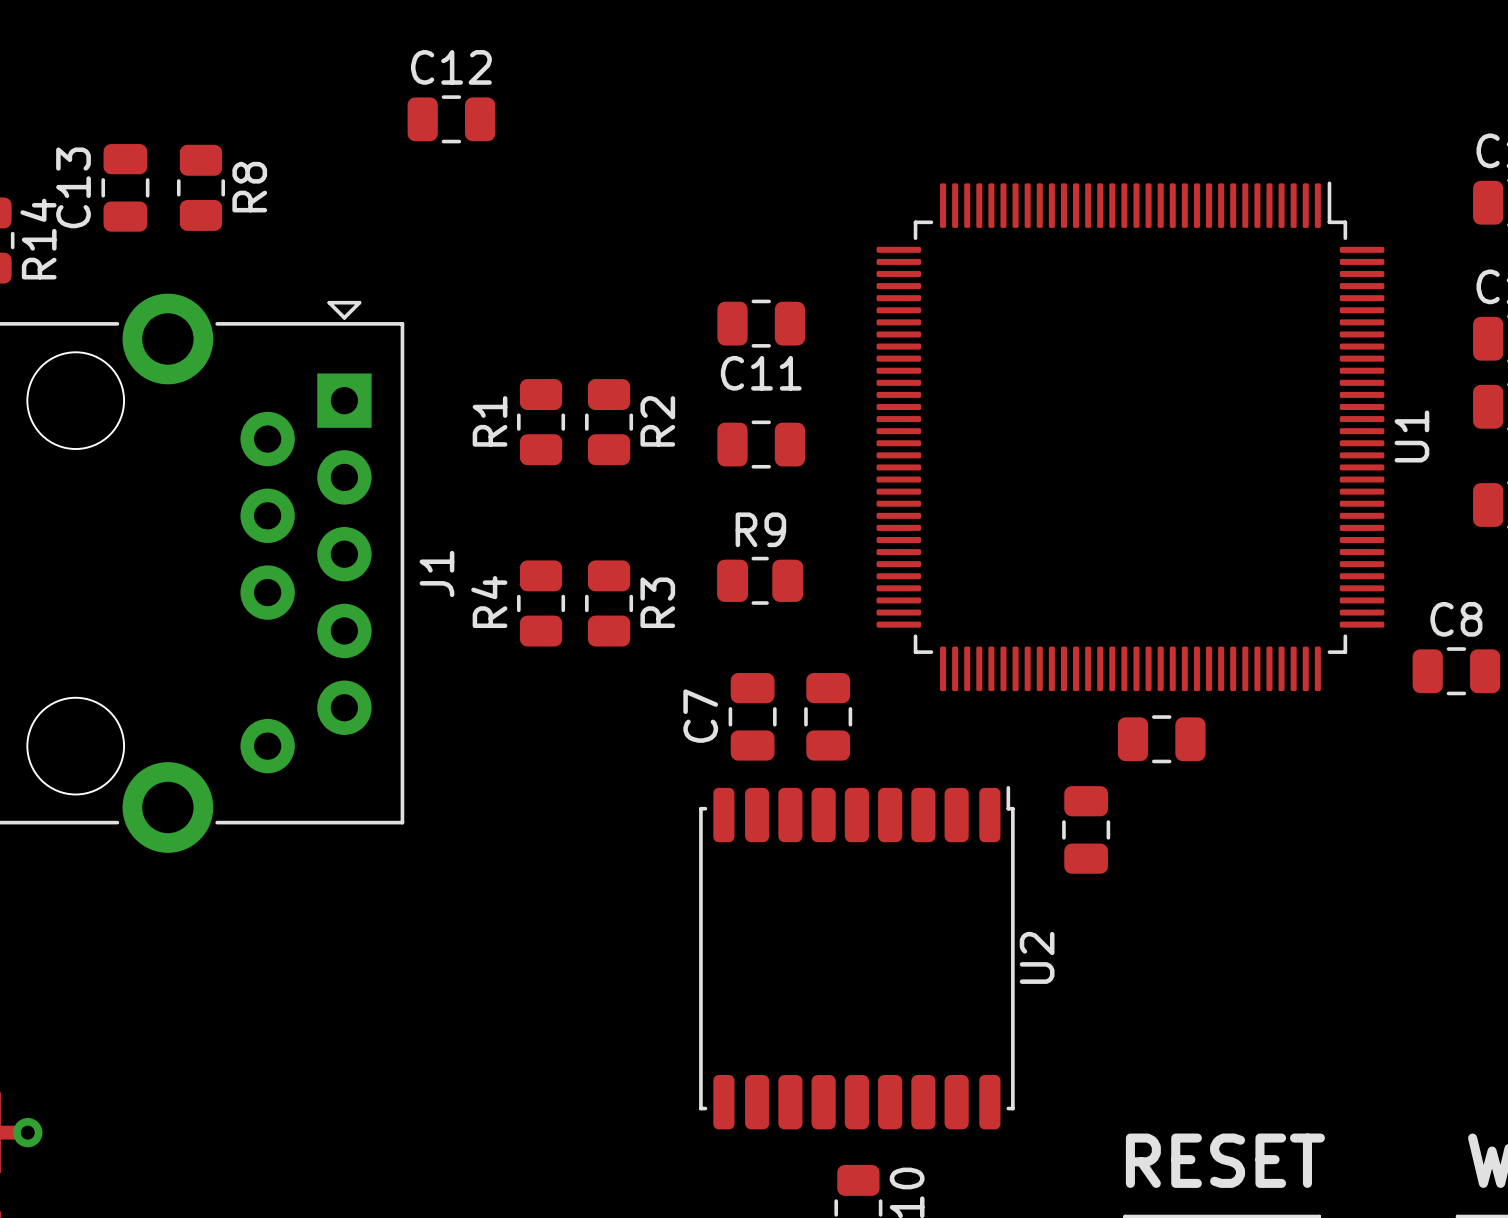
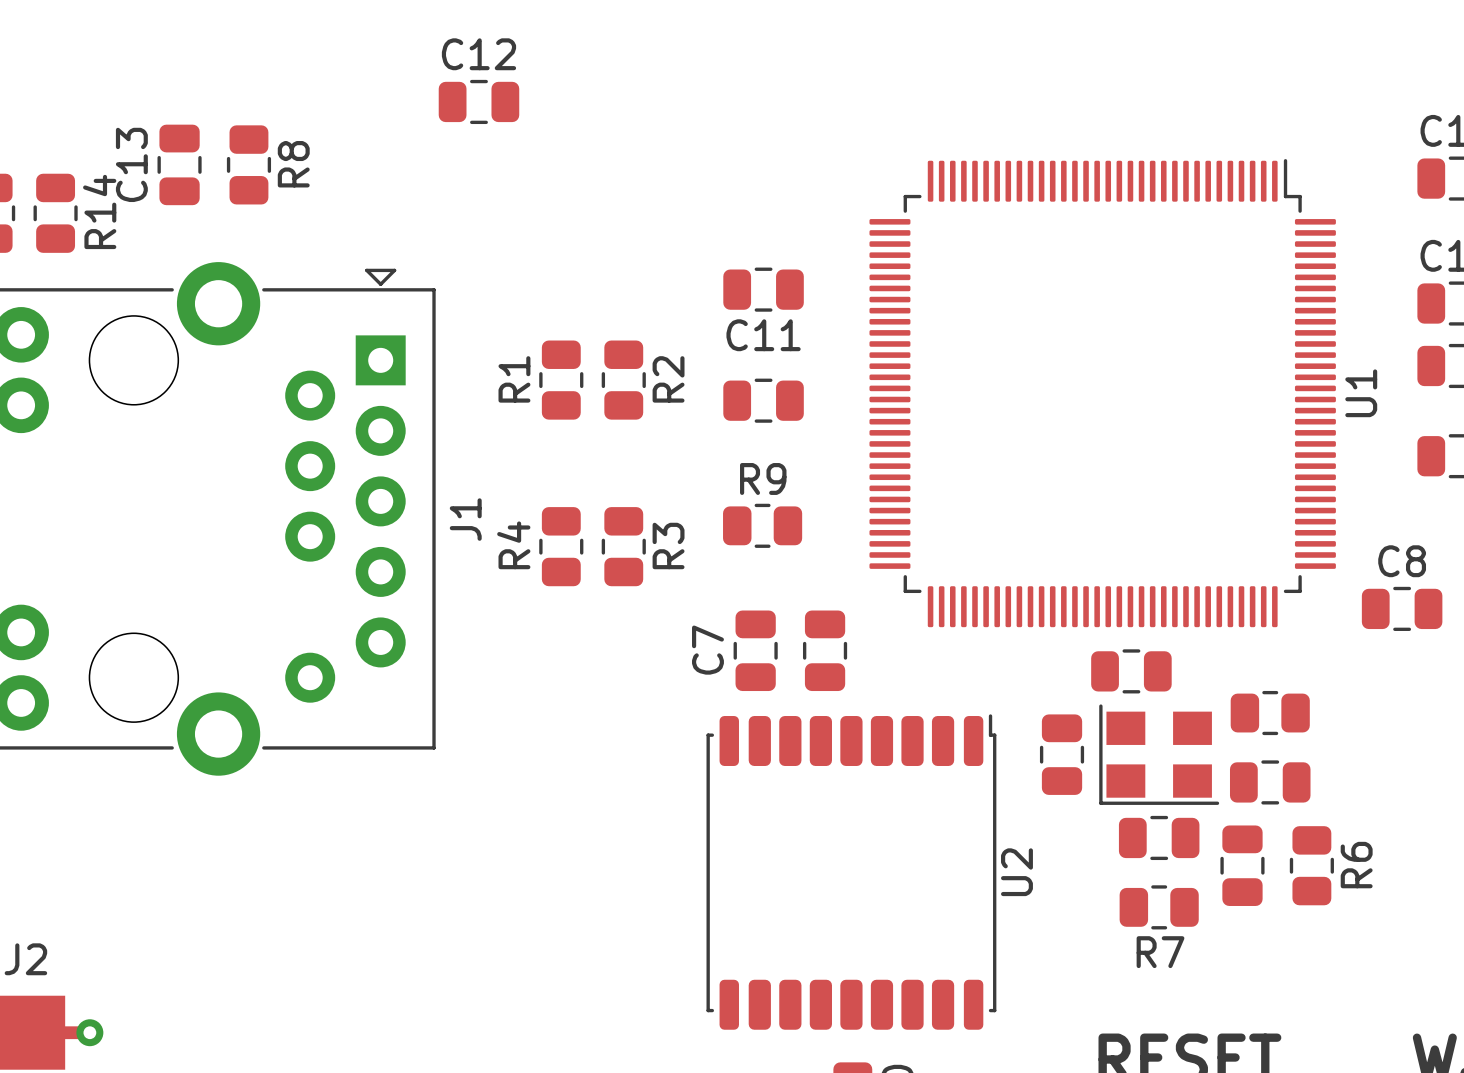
part: none -> (1270, 713)
part: none -> (1159, 754)
part: none -> (1270, 782)
part: none -> (1159, 837)
part: none -> (1242, 865)
R6: none -> (1311, 865)
R7: none -> (1159, 907)

